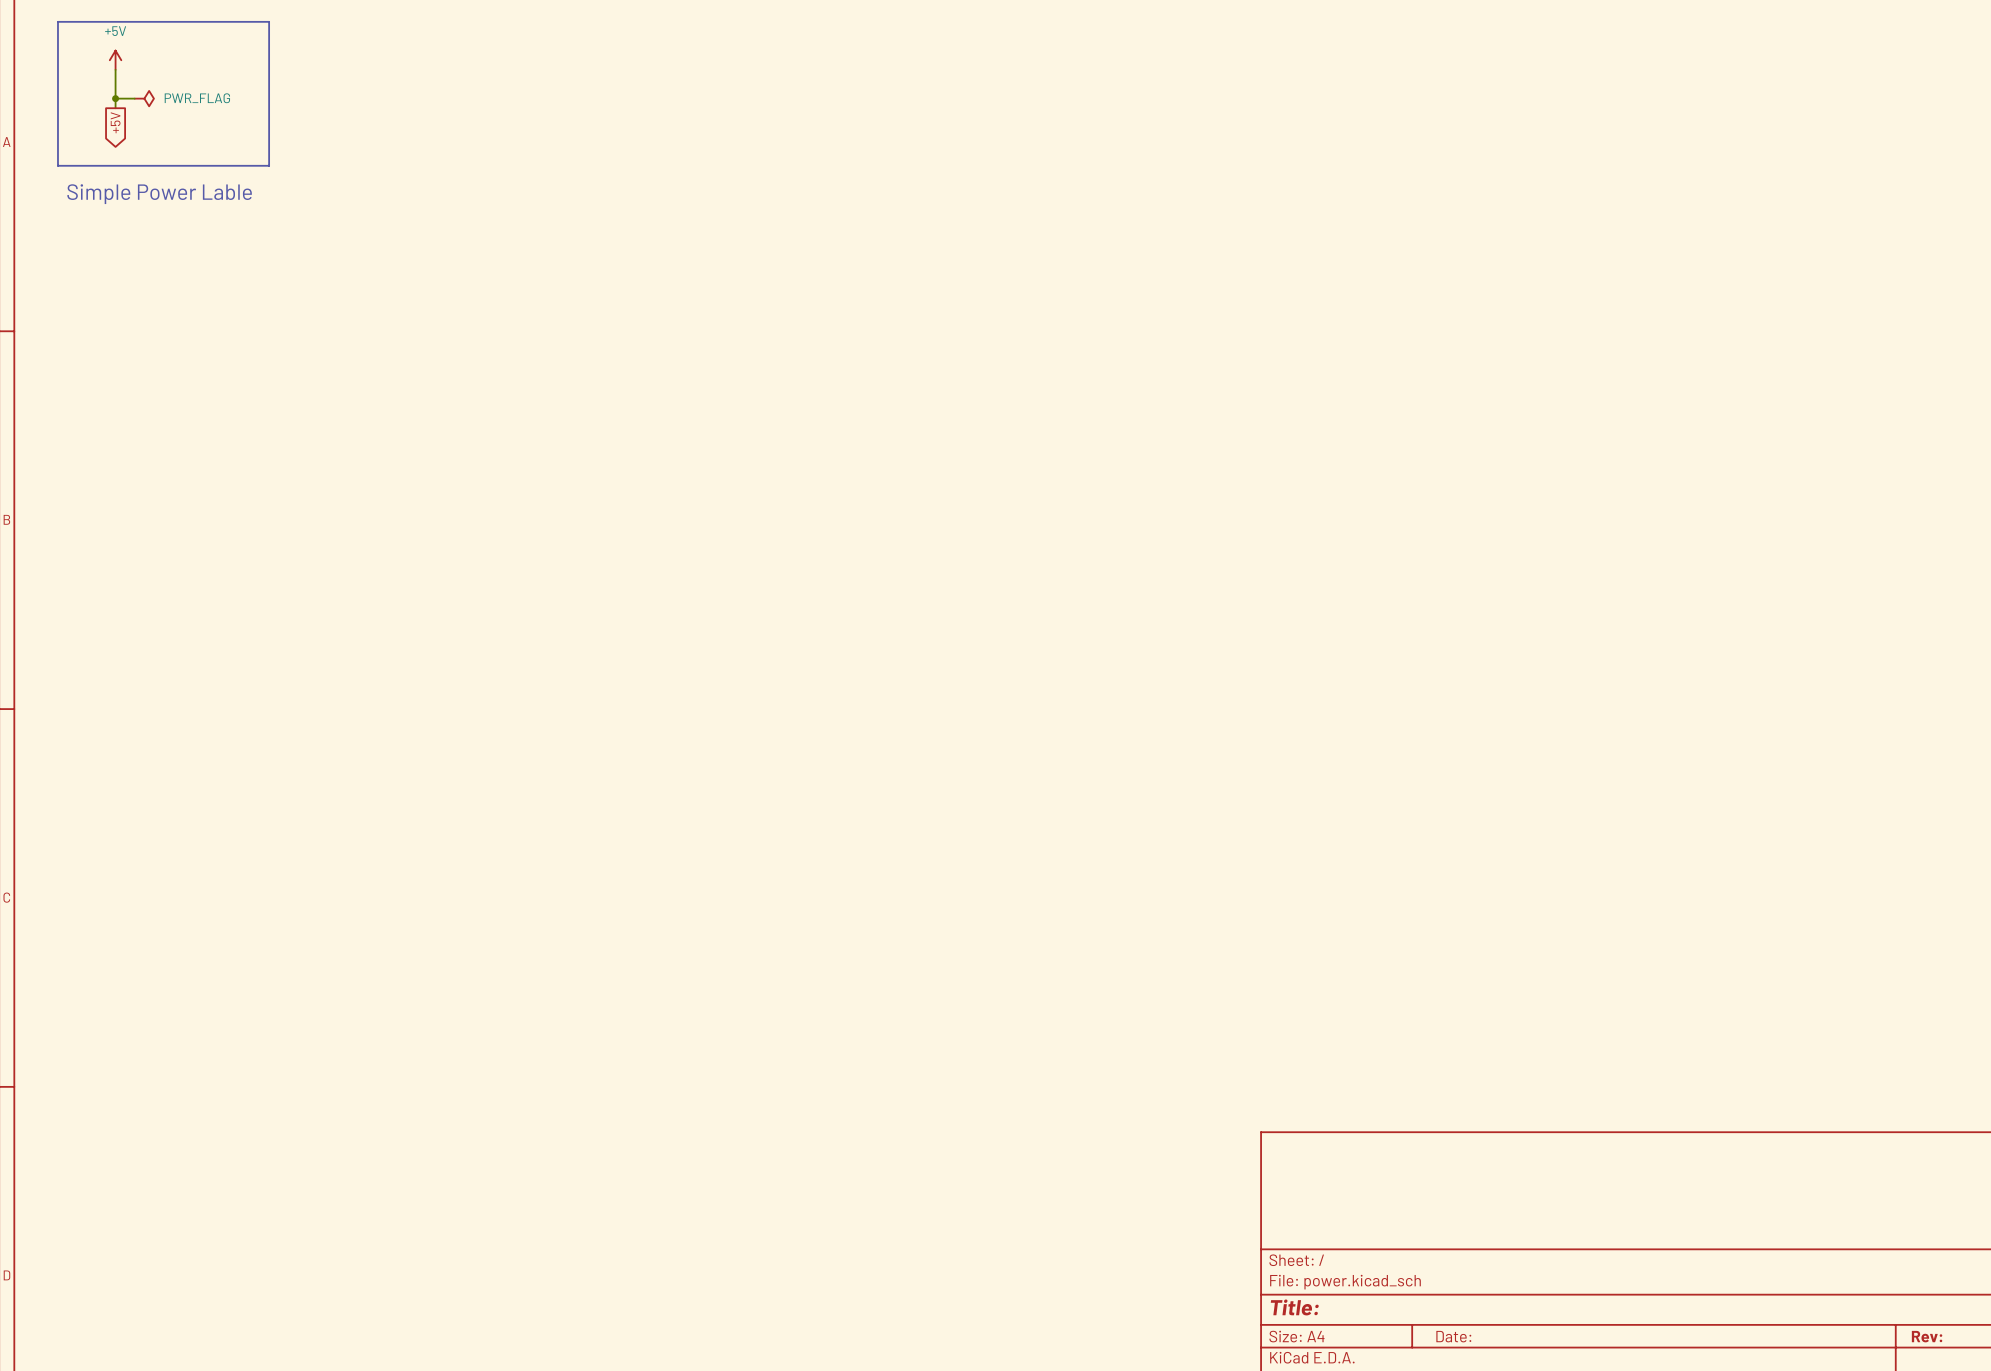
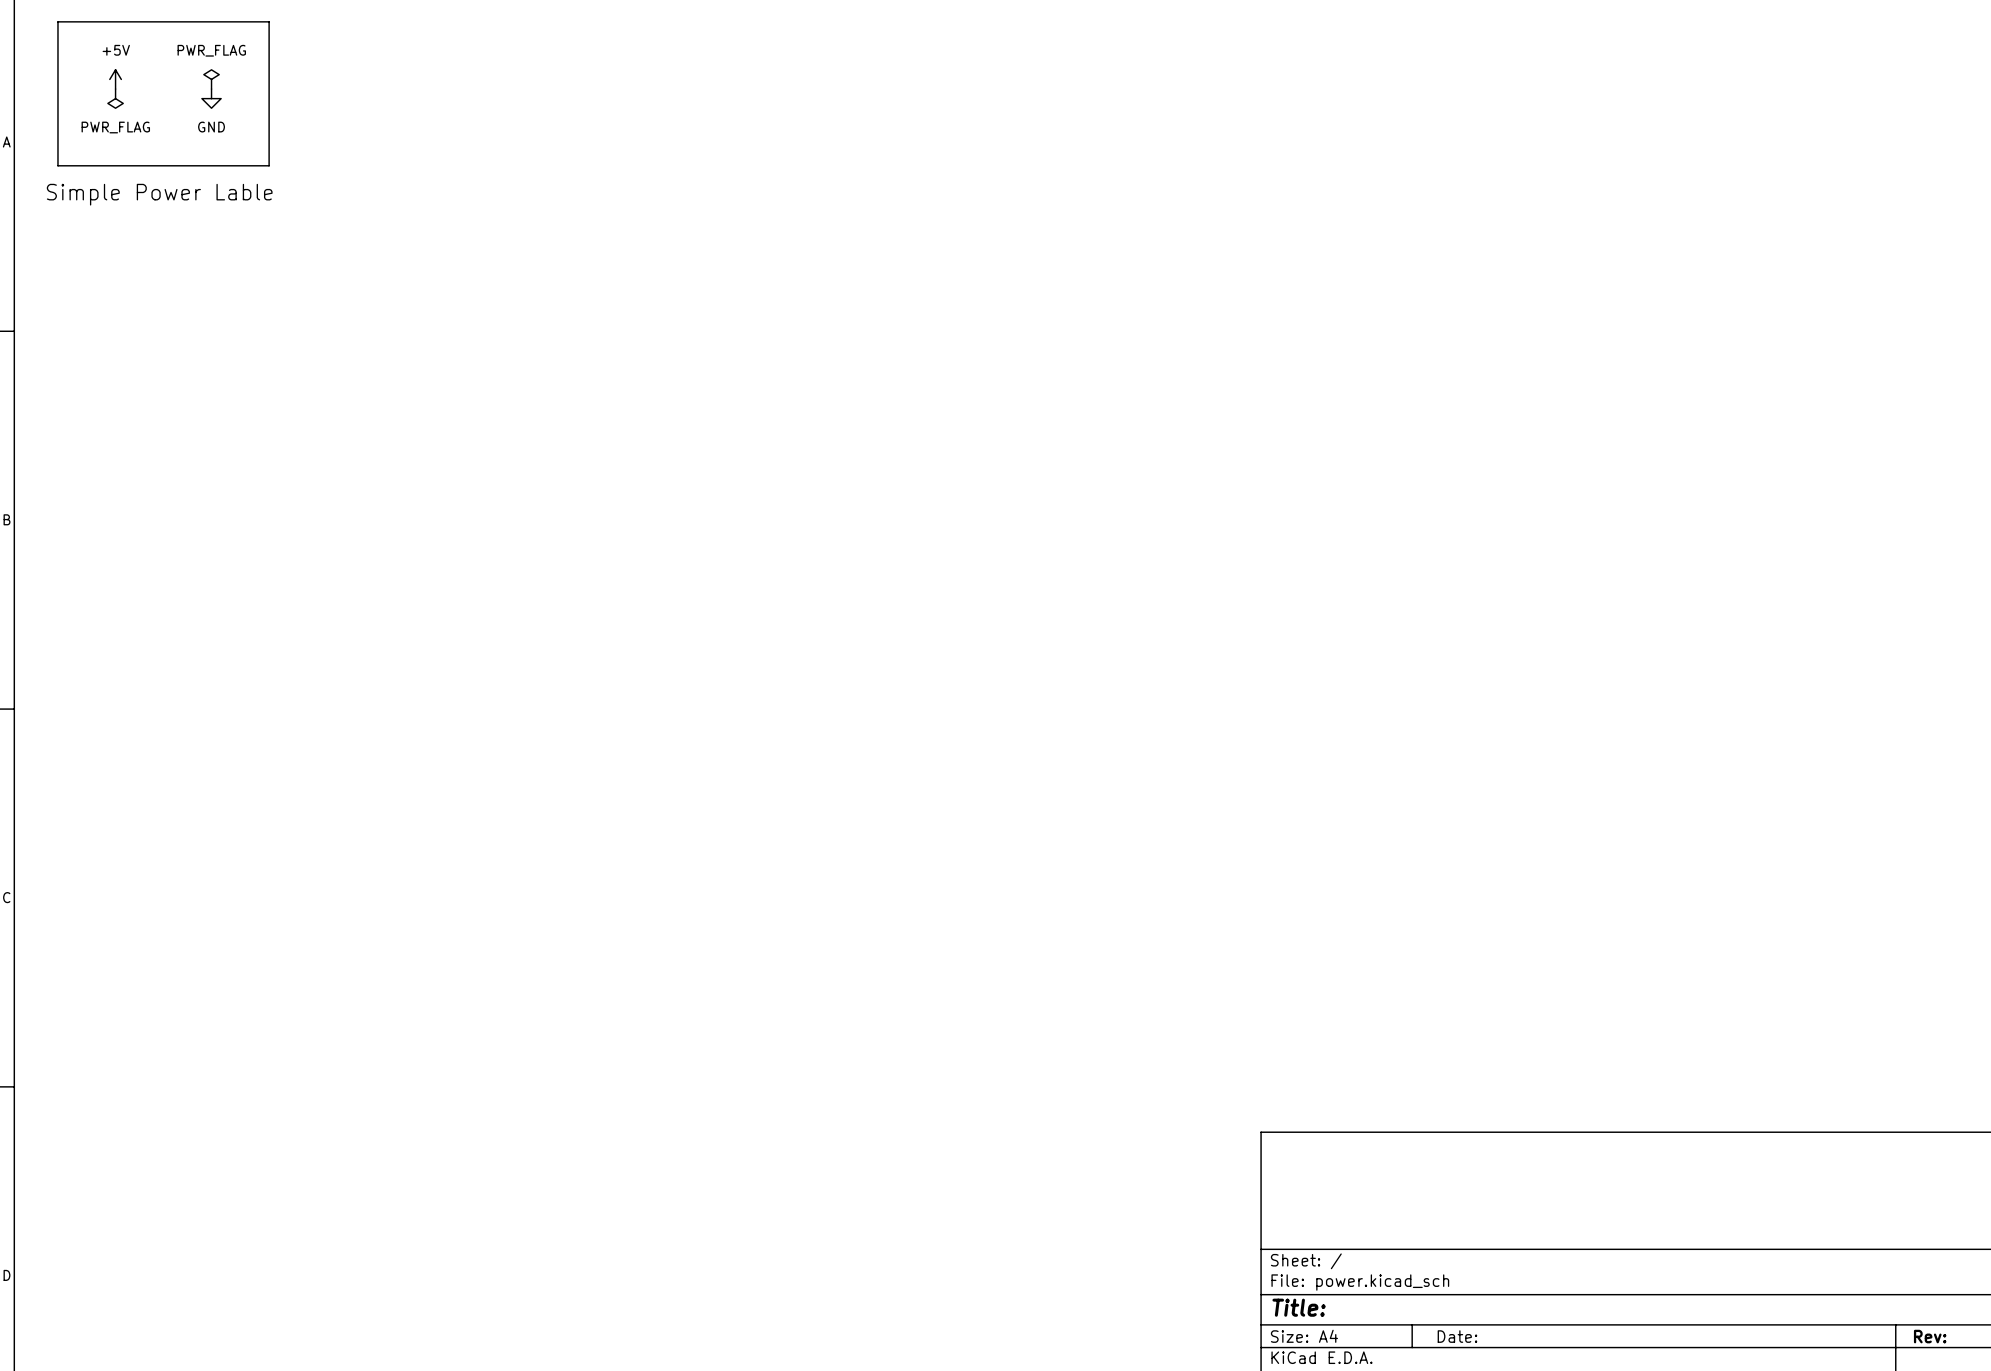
power symbol position: +5V (115, 60) -> +5V (115, 79)
power symbol: none -> PWR_FLAG (211, 79)
wire: (115, 98) (134, 98) -> none
junction: (115, 98) -> none
power symbol rotation: 0° (144, 98) -> 90° clockwise (115, 98)
power symbol position: PWR_FLAG (144, 98) -> PWR_FLAG (115, 98)
power symbol text position: PWR_FLAG (197, 98) -> PWR_FLAG (115, 127)
power symbol: none -> GND (211, 98)
global label: +5V (115, 122) -> none

